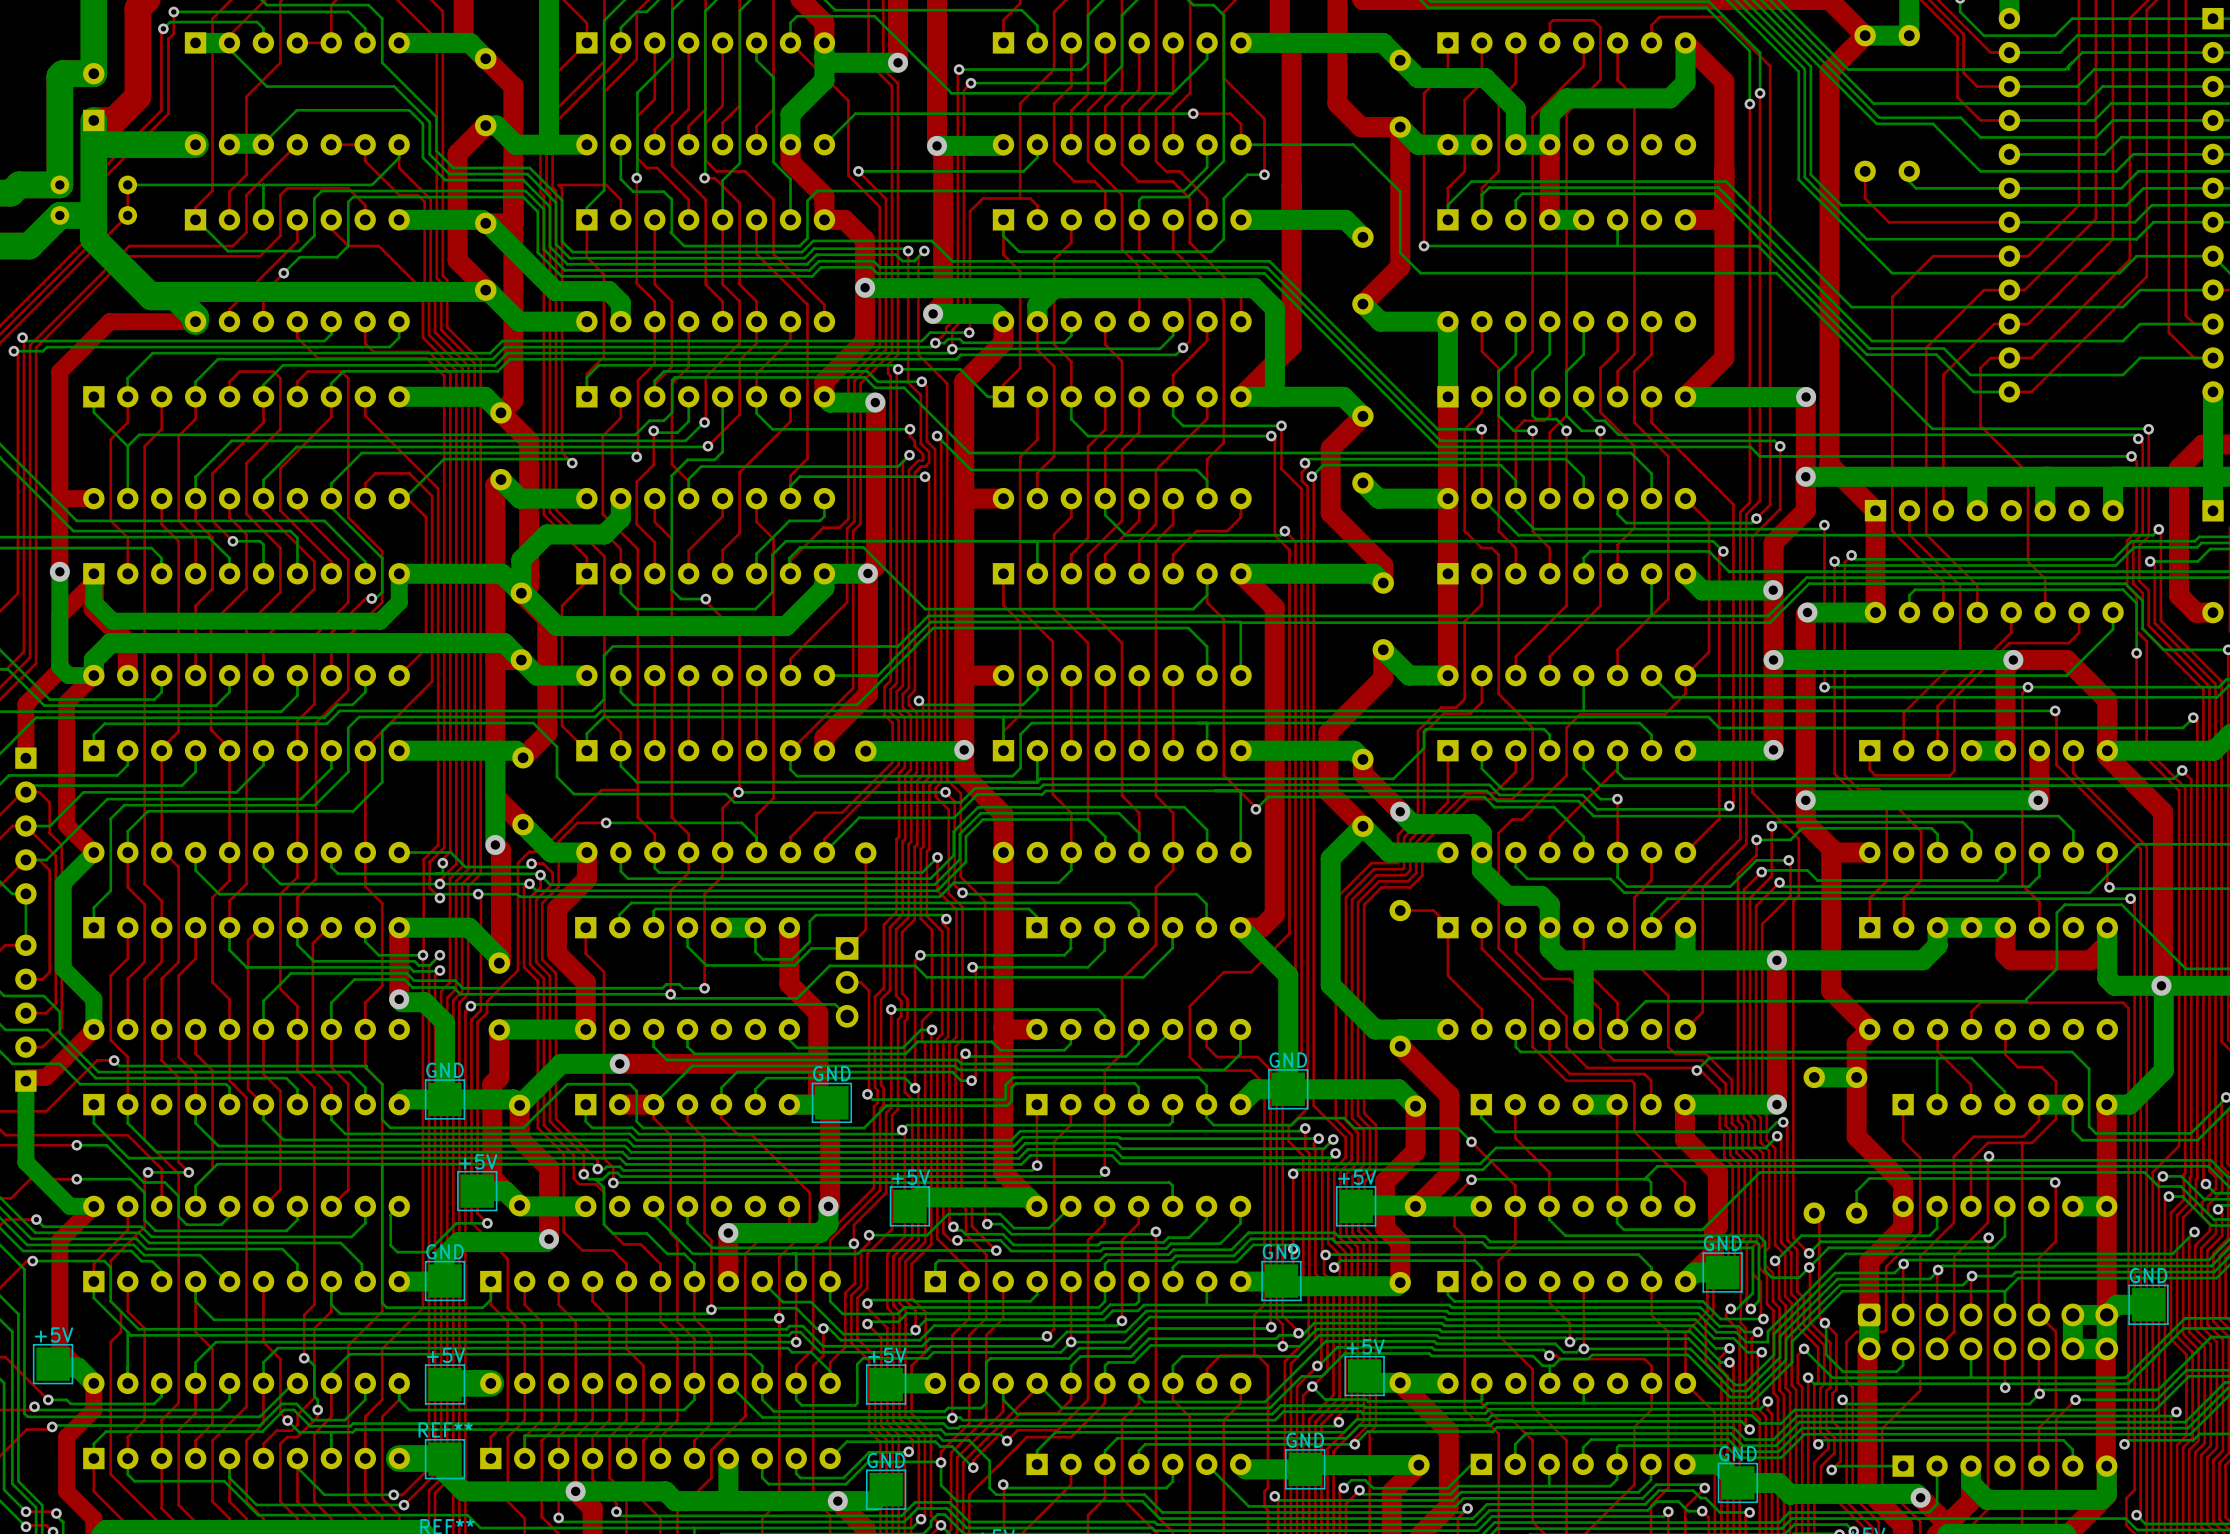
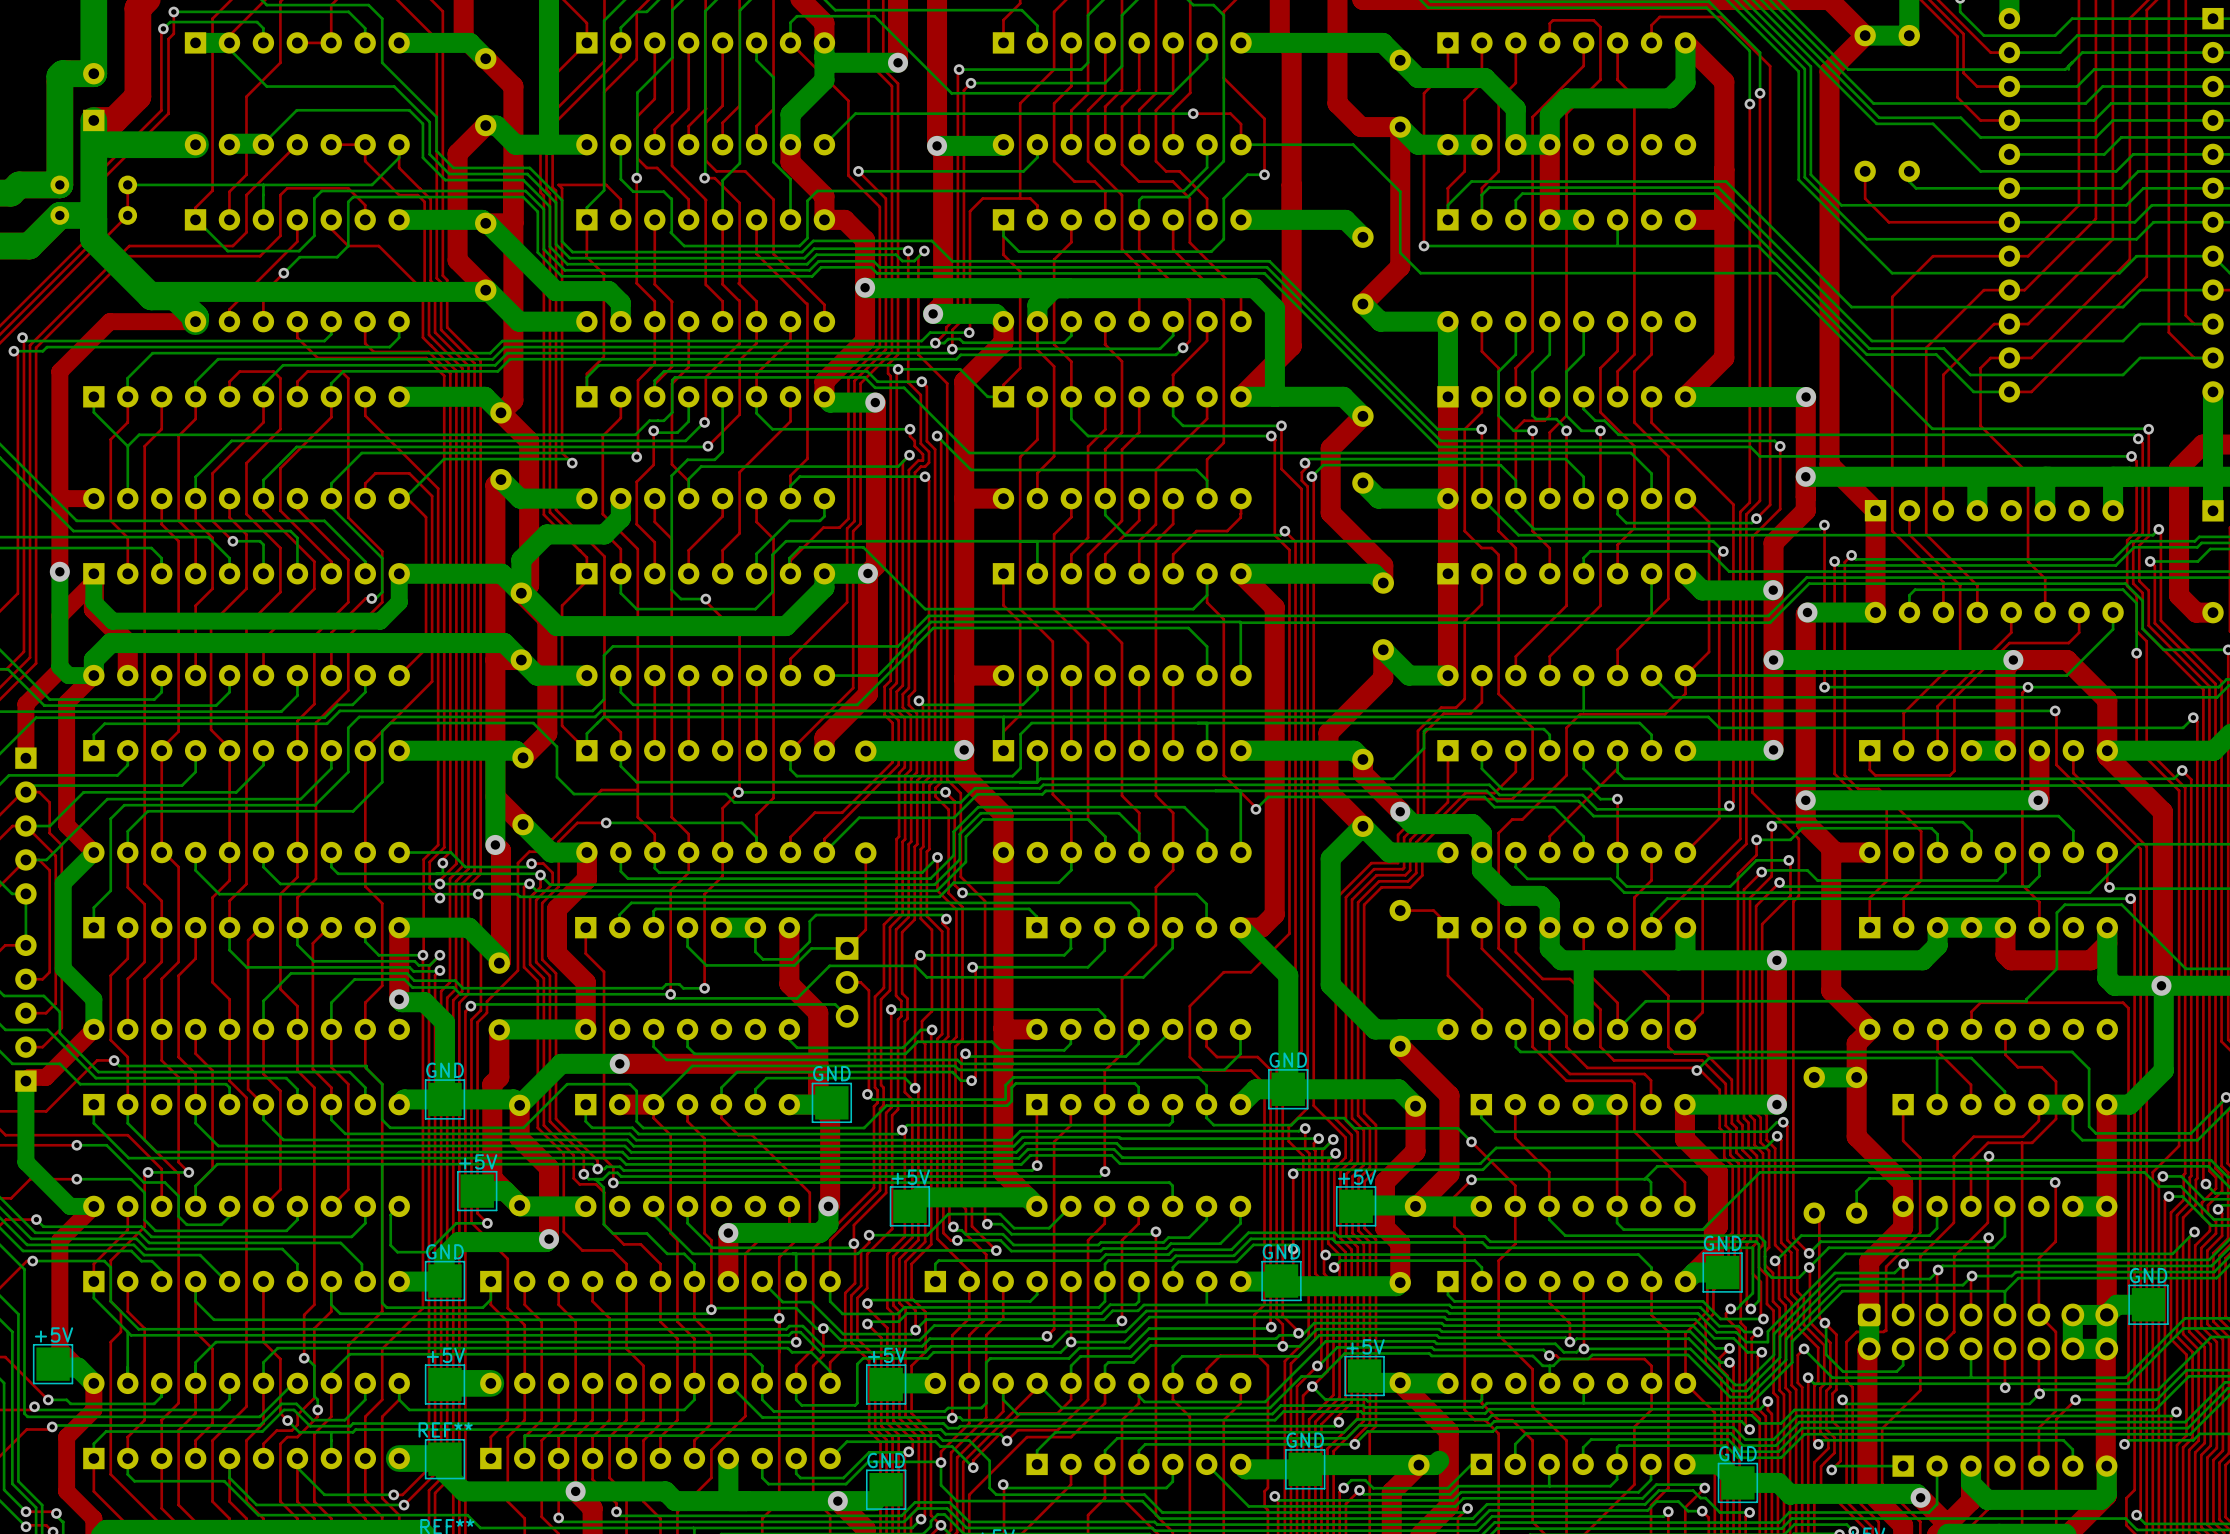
bottom track: none -> (1439, 1460) (1434, 1465) (1418, 1465)

